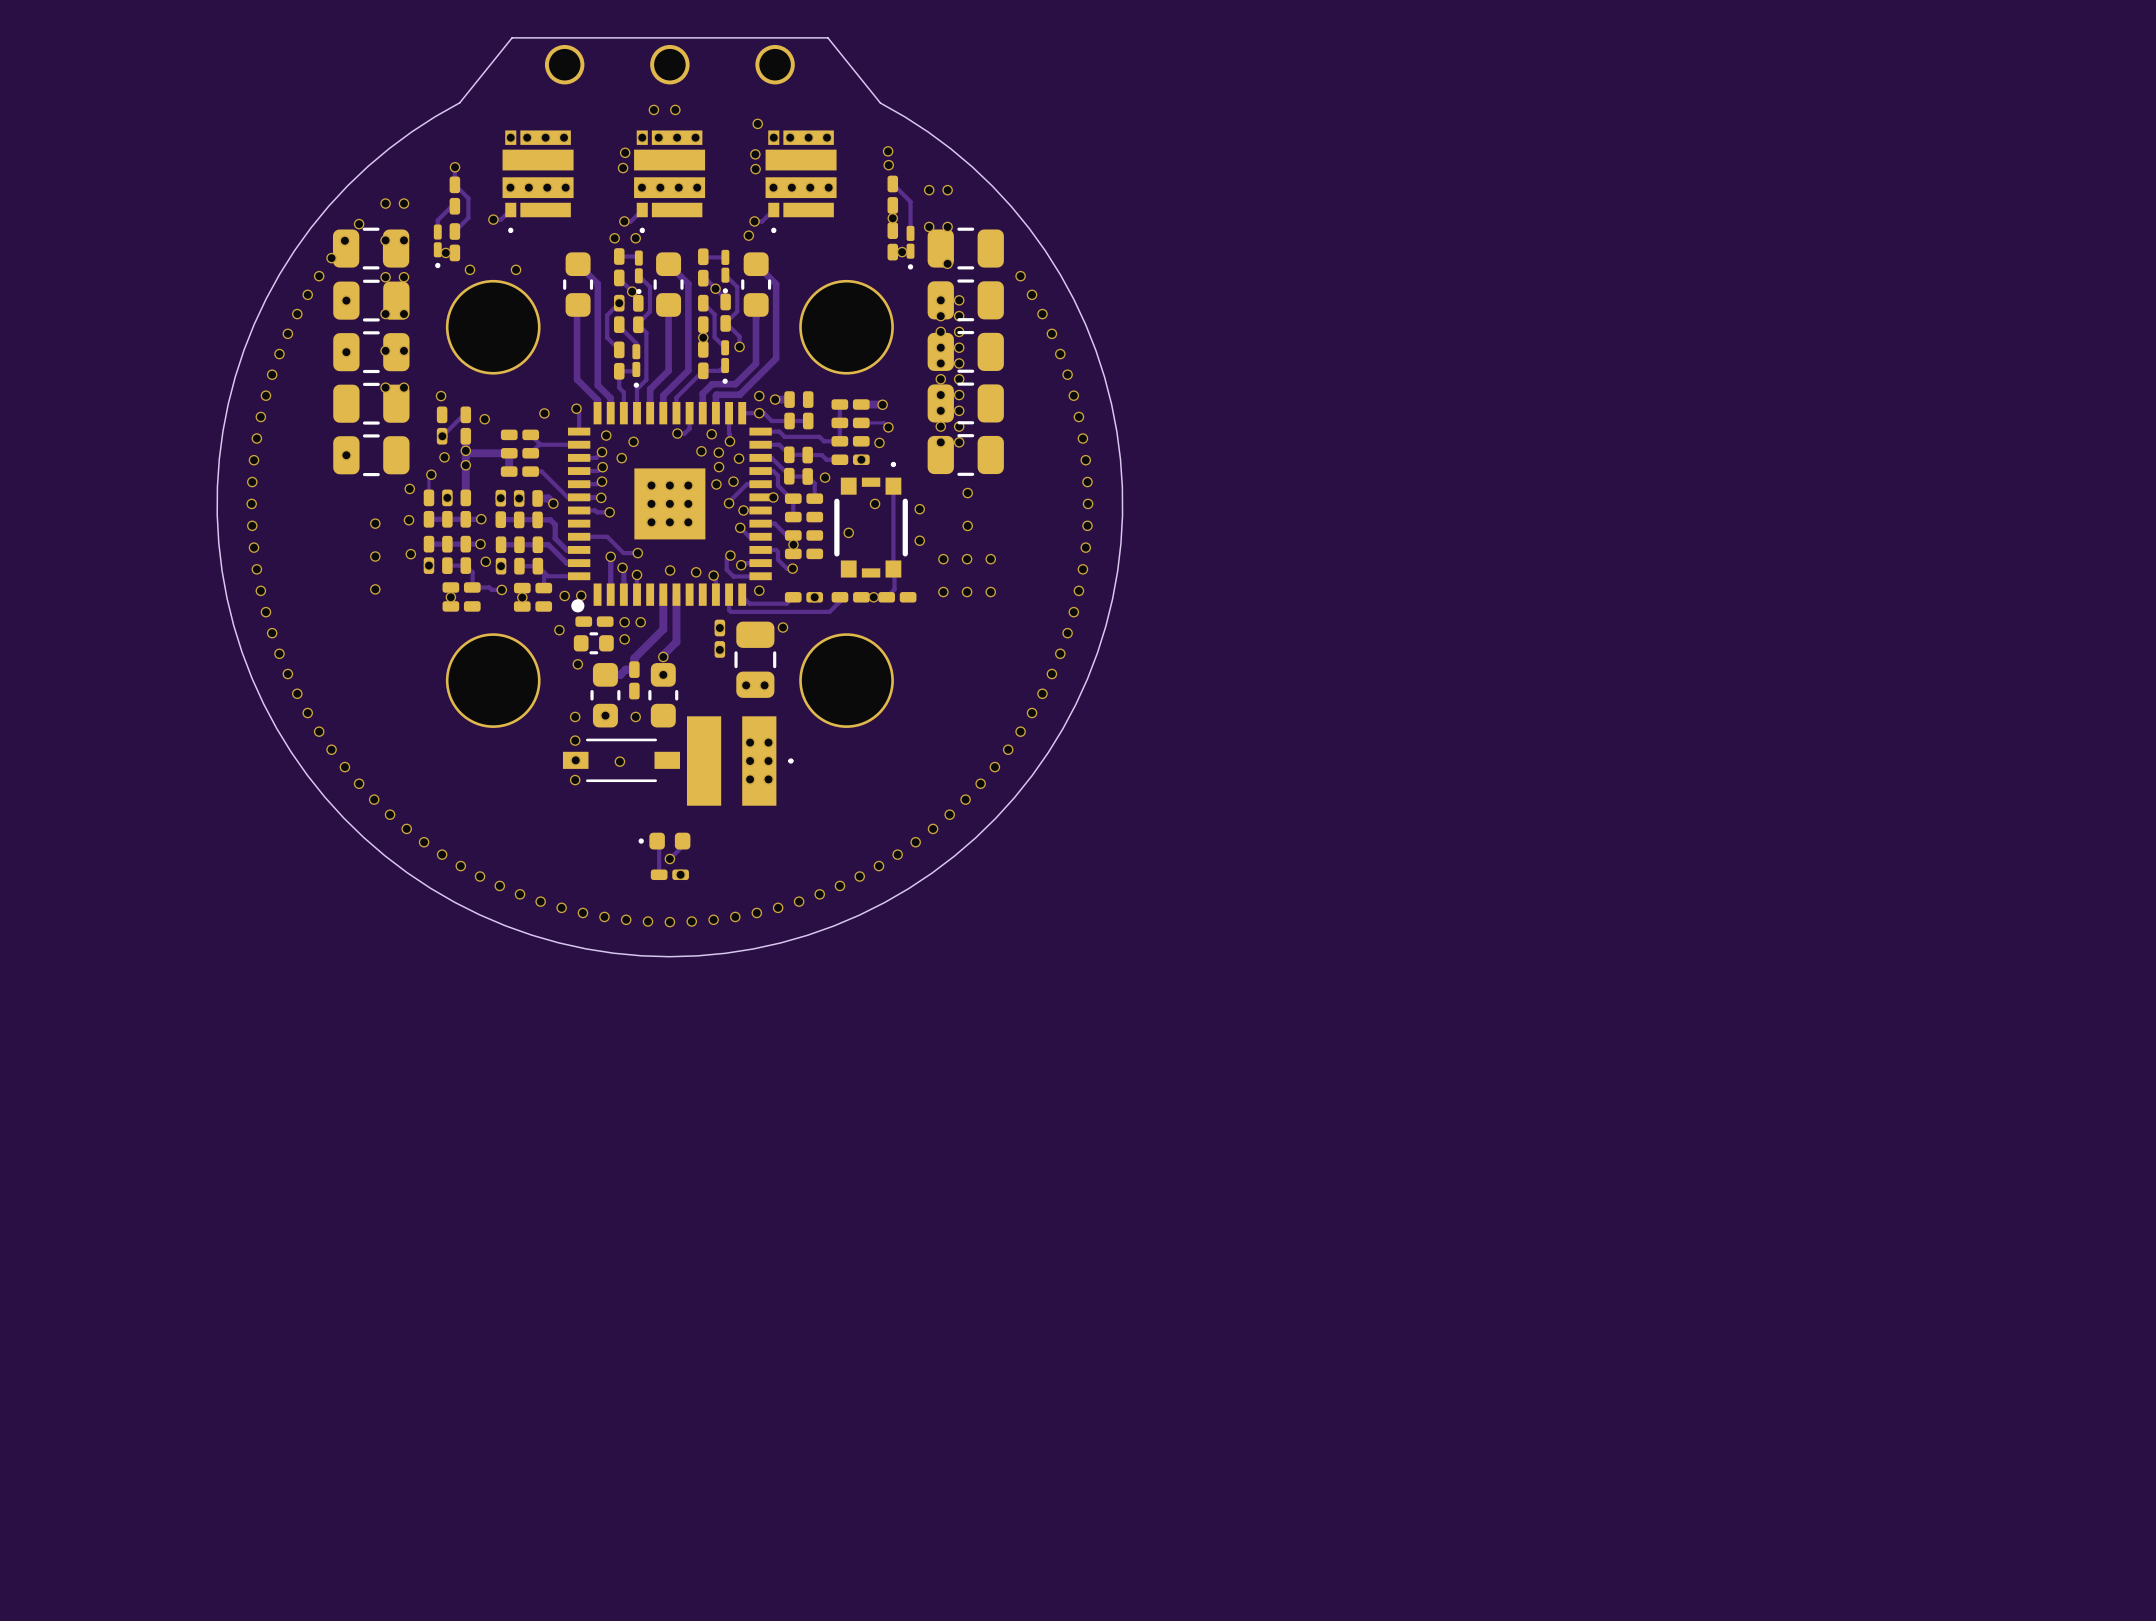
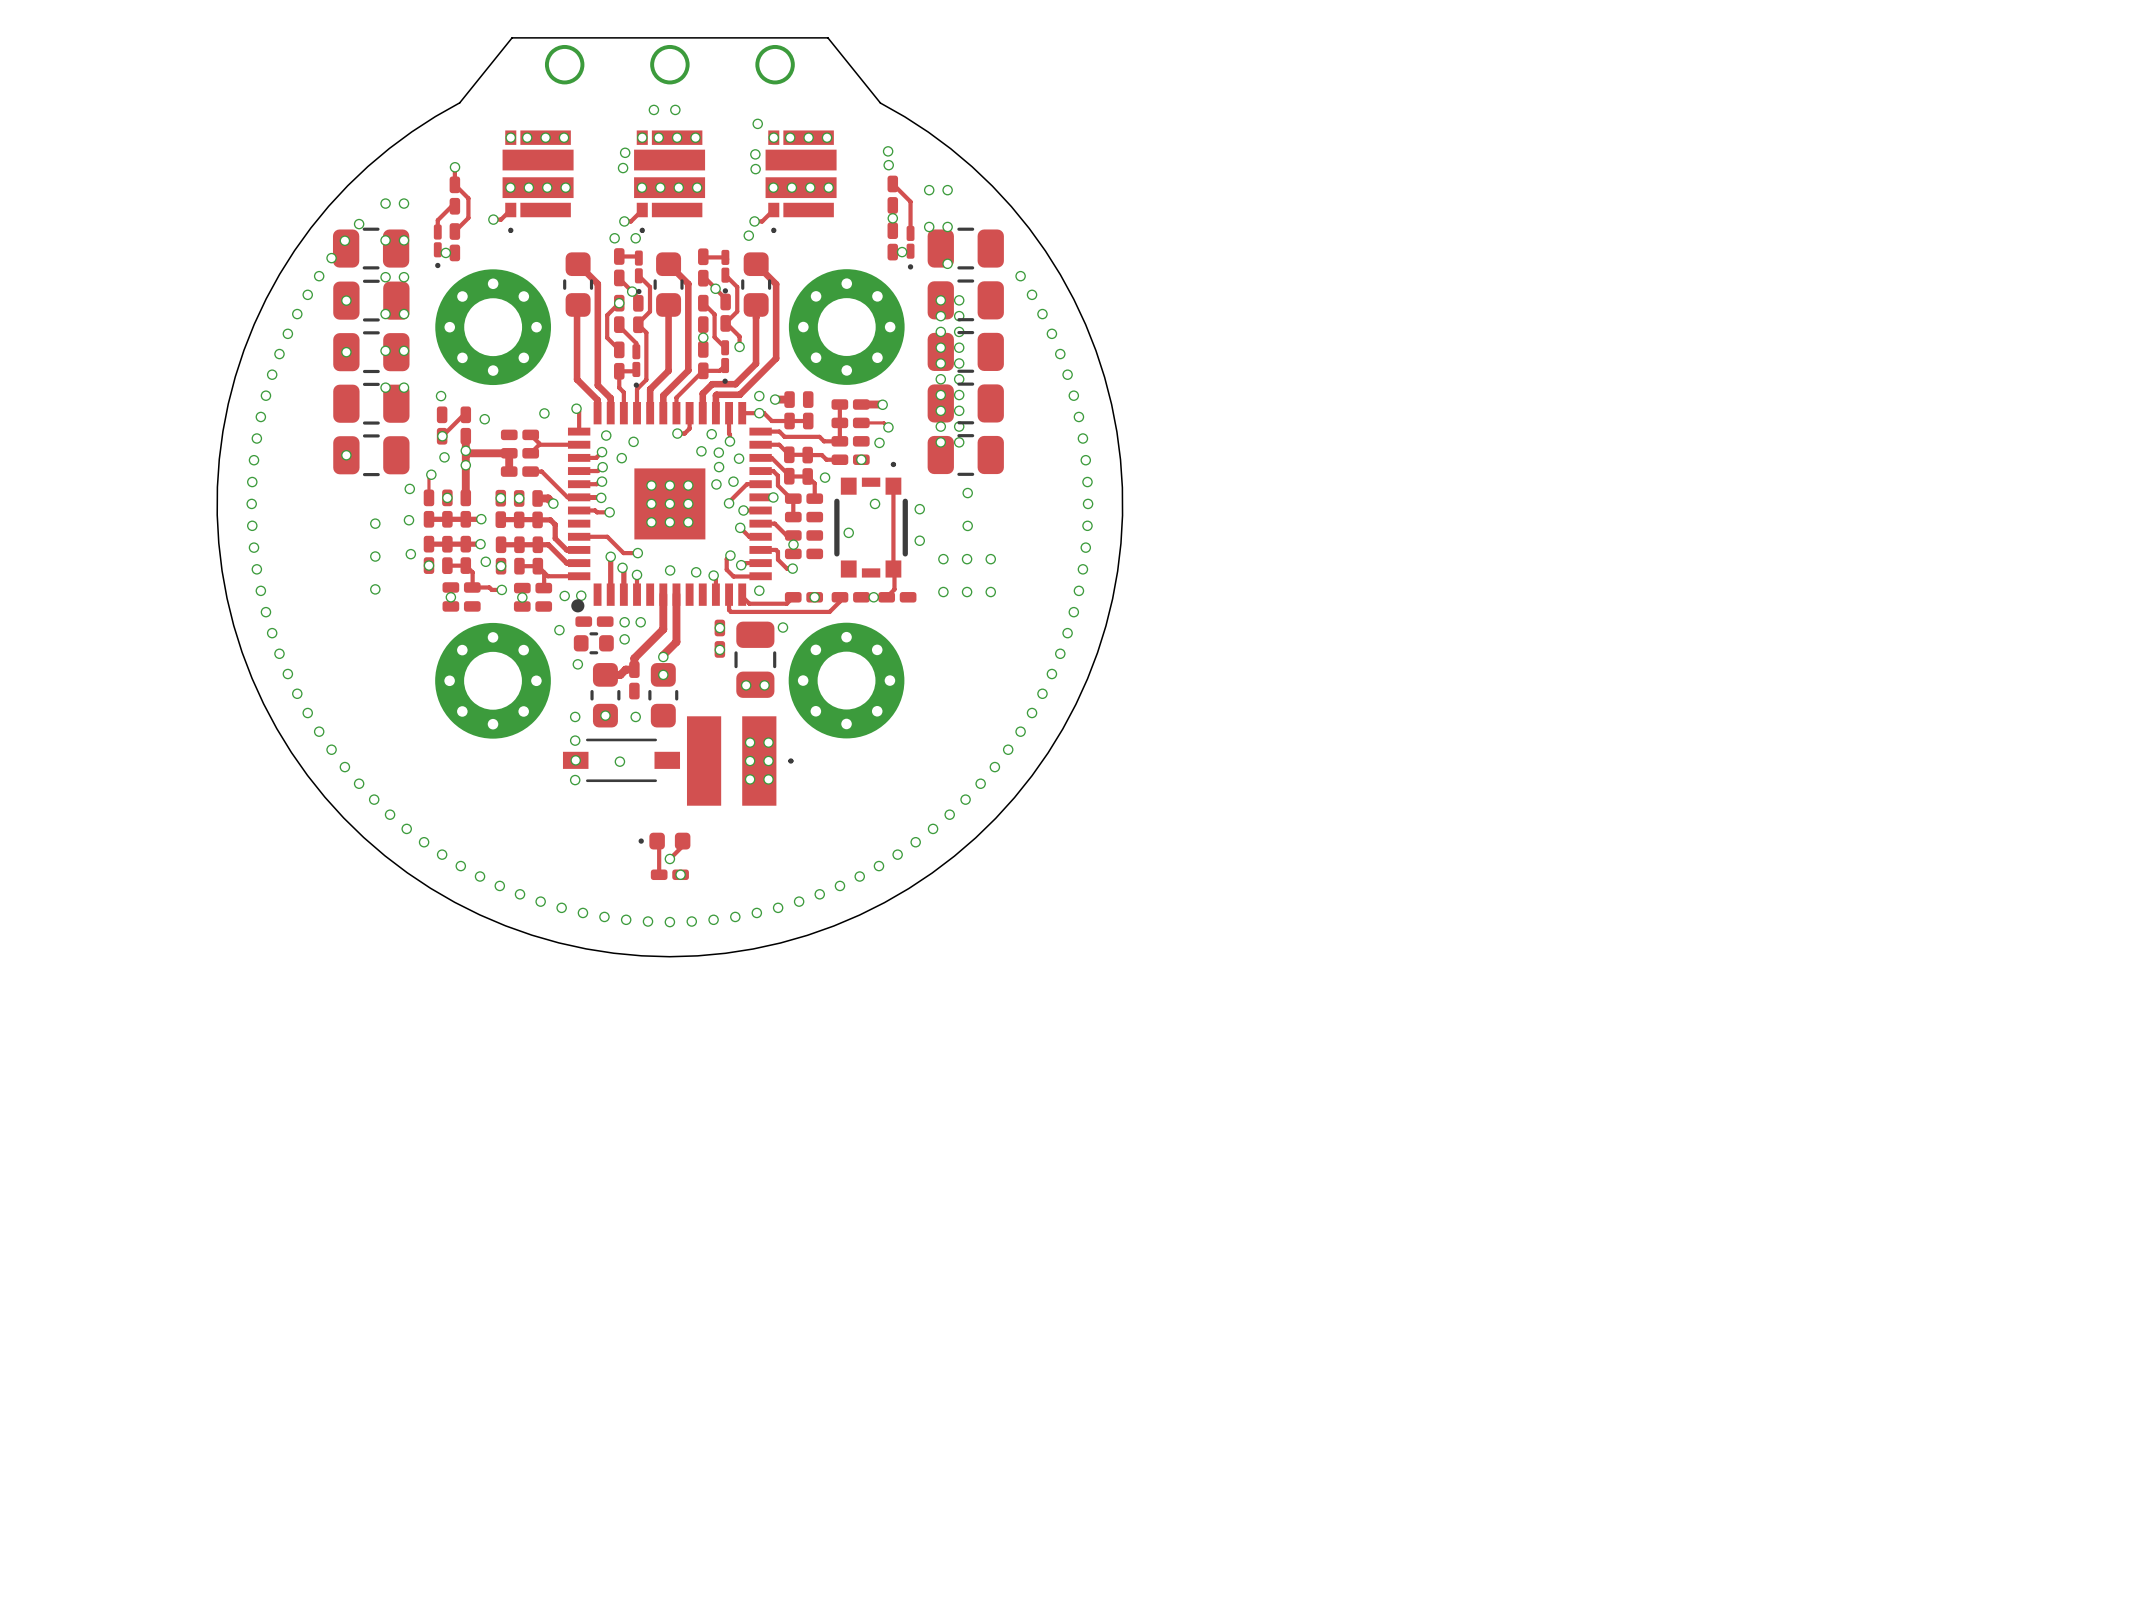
via: (470, 269) -> none
via: (516, 269) -> none
part footprint: [445, 279, 541, 375] -> [435, 269, 552, 386]
part footprint: [799, 279, 894, 375] -> [788, 269, 905, 385]
part footprint: [445, 633, 541, 728] -> [435, 622, 551, 739]
part footprint: [799, 633, 894, 728] -> [788, 622, 905, 739]

